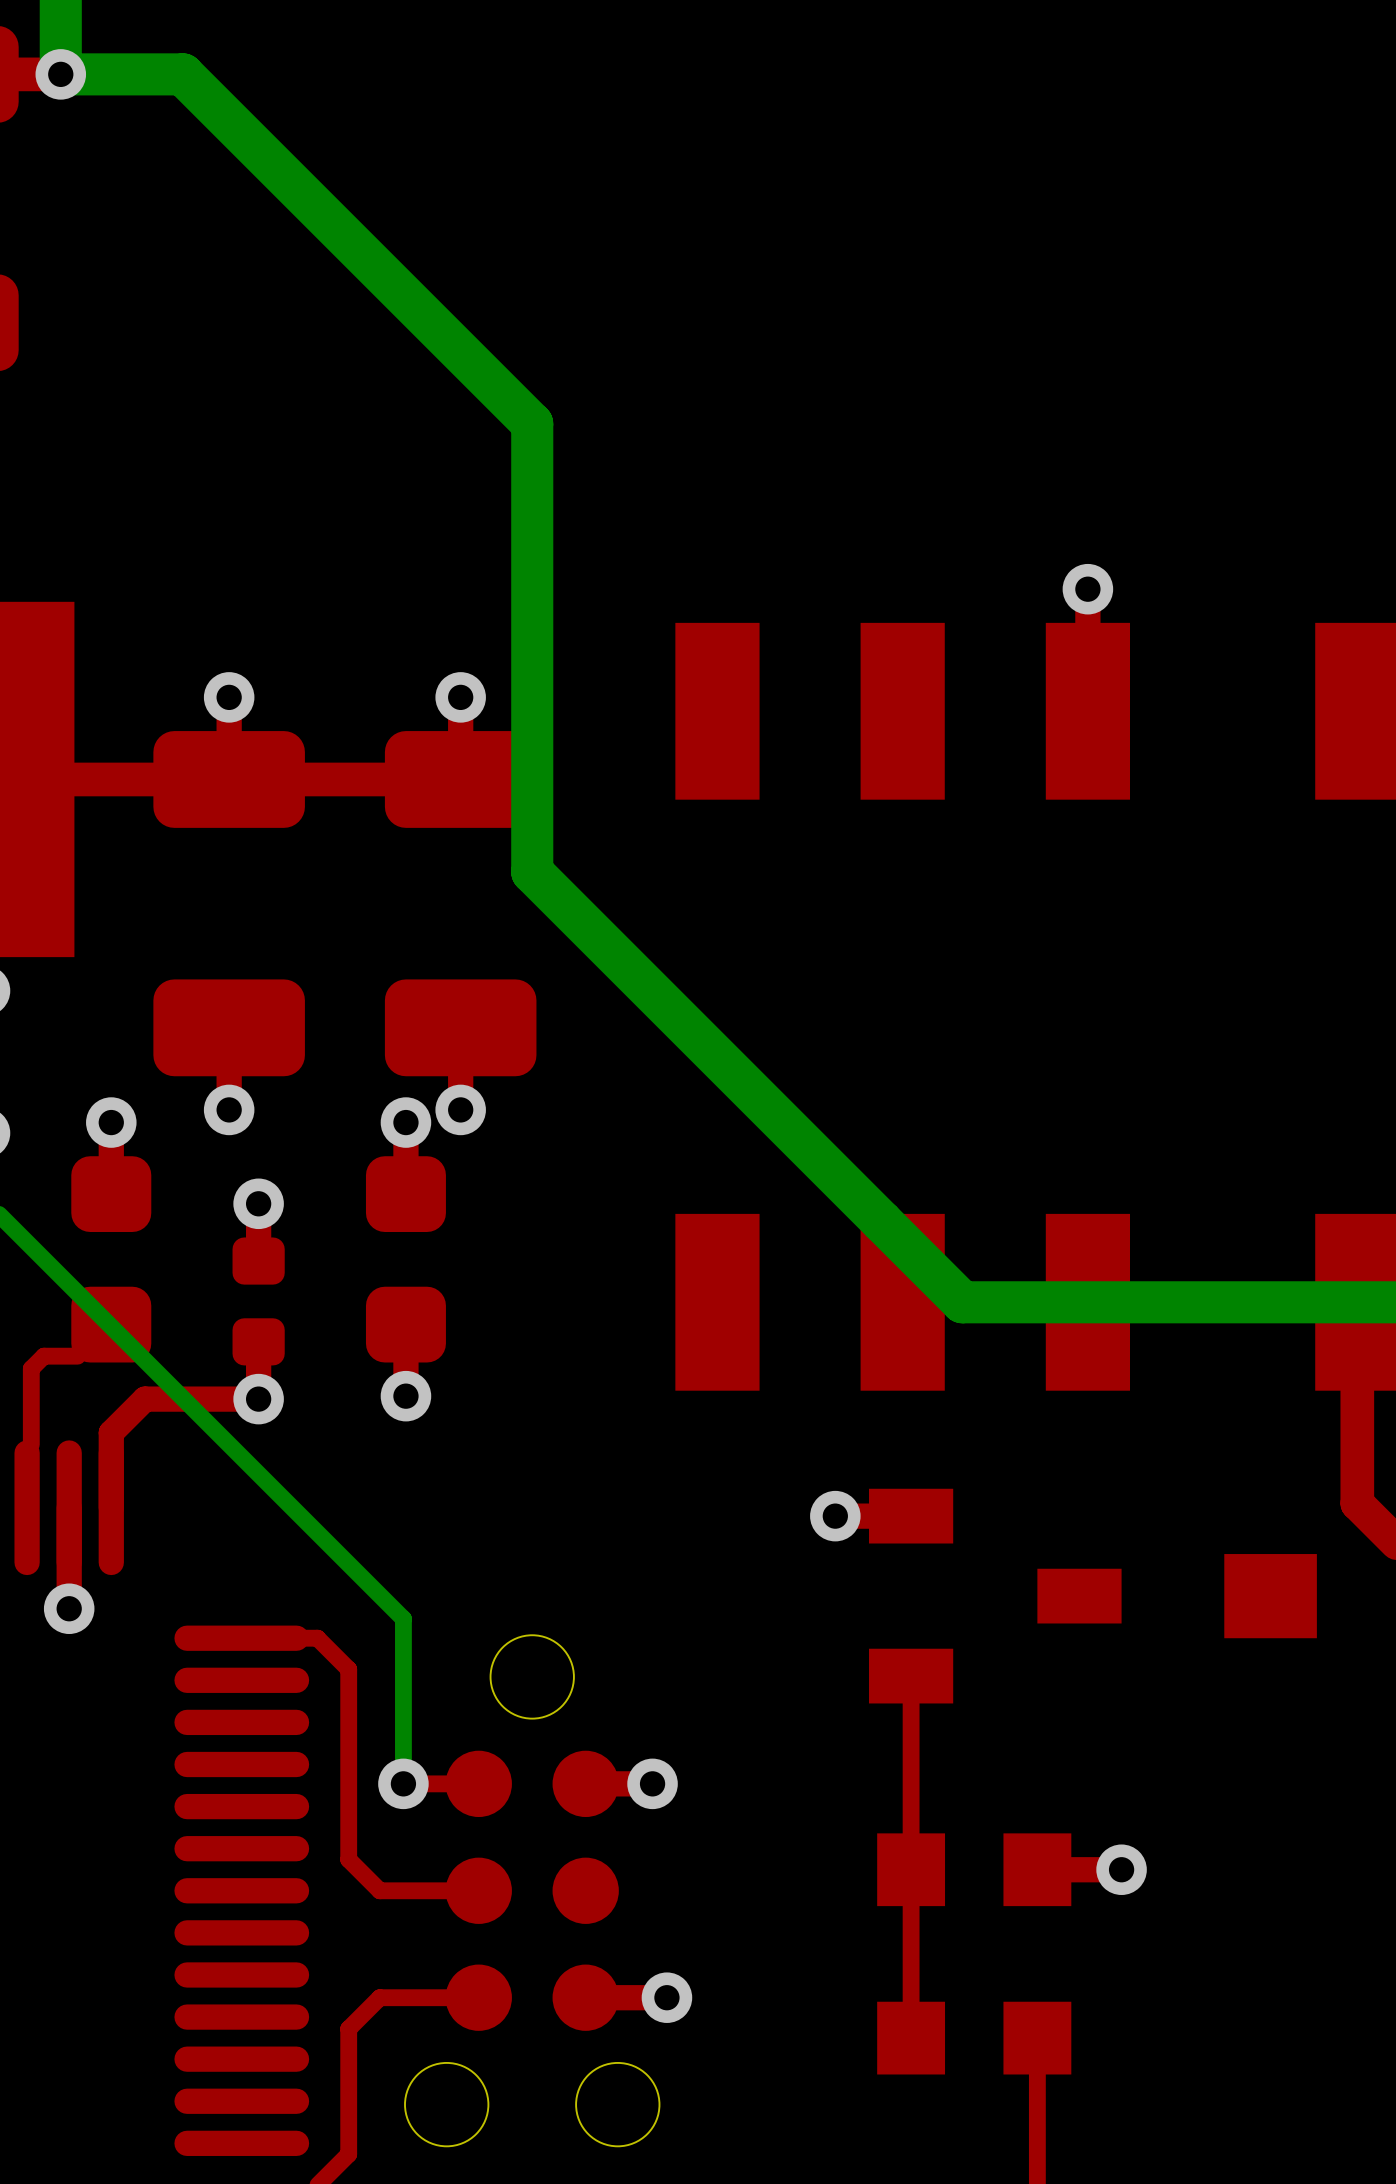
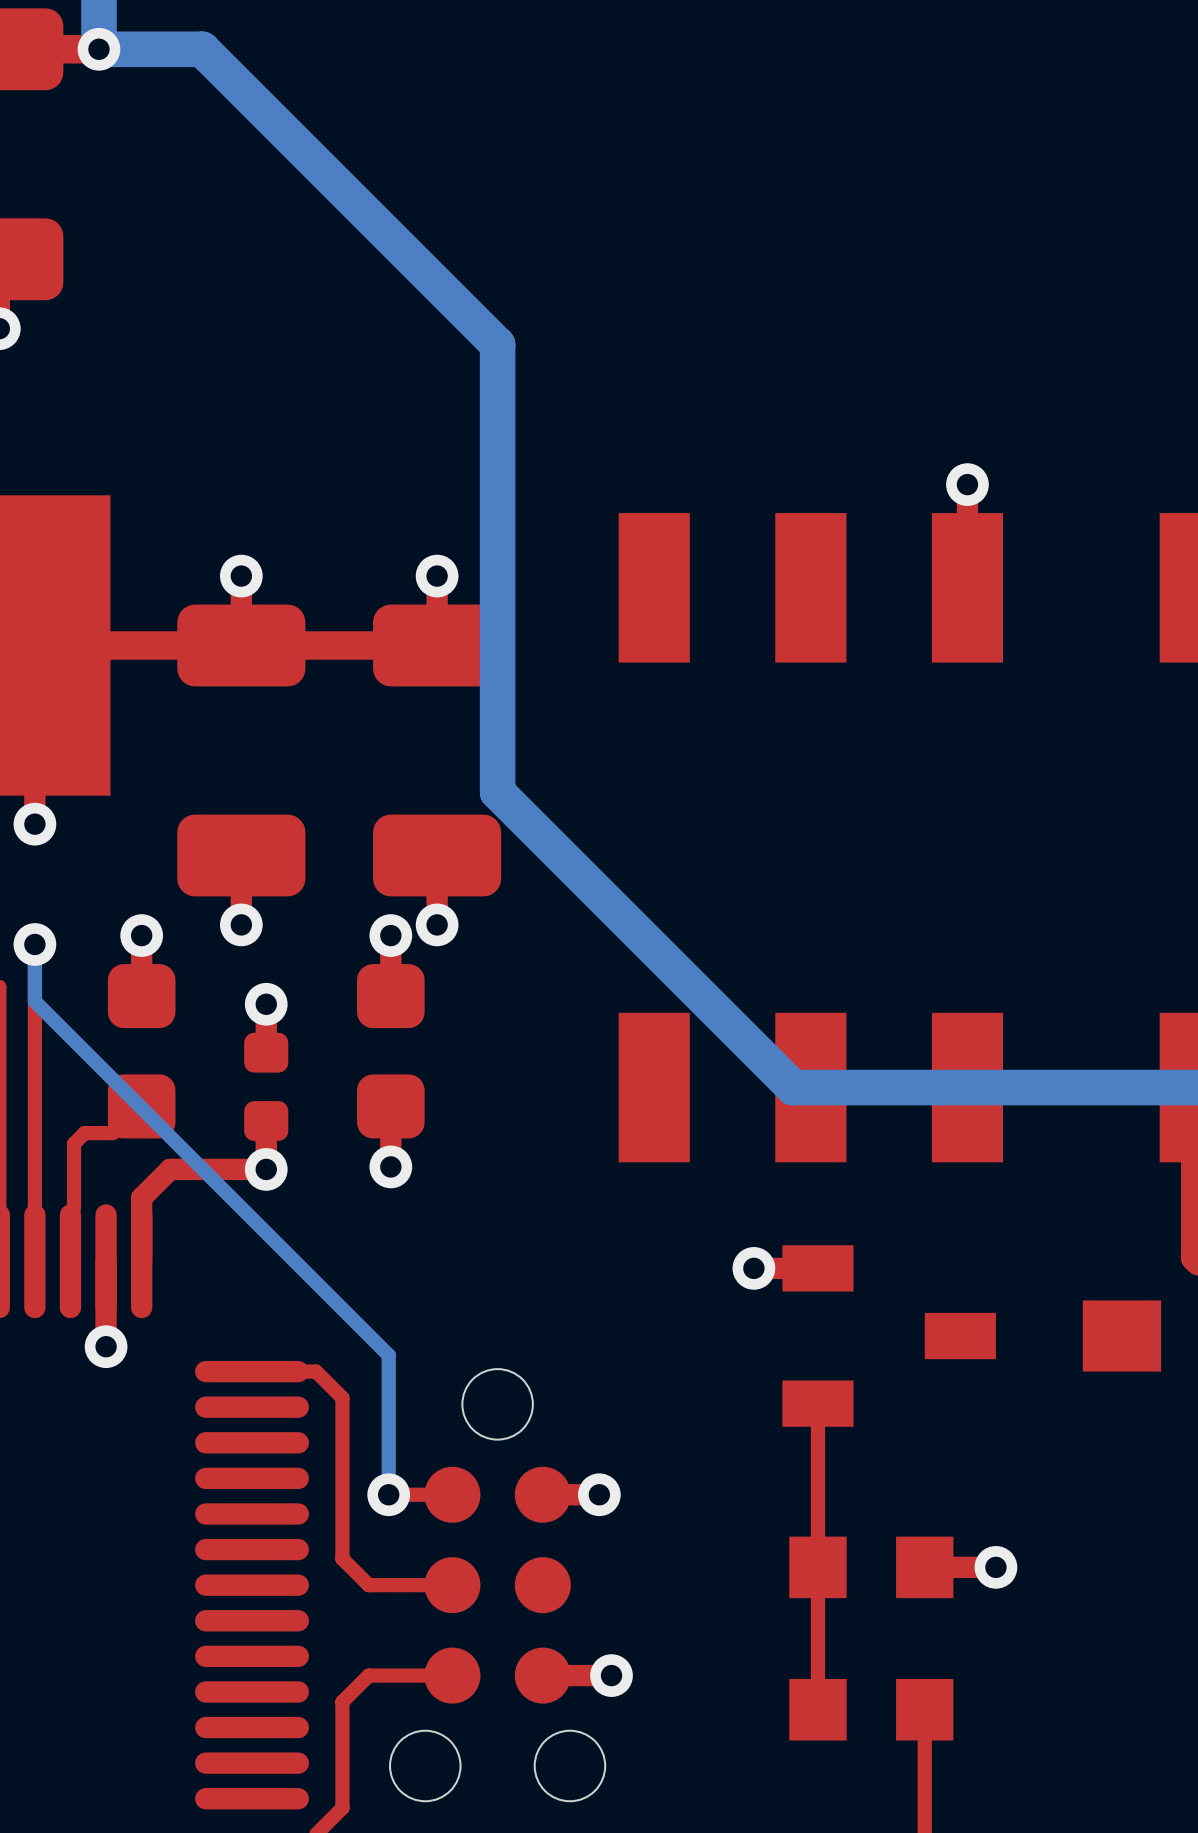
bottom track: (532, 872) (962, 1302) -> (497, 723) (497, 792) (793, 1087) (861, 1087)

